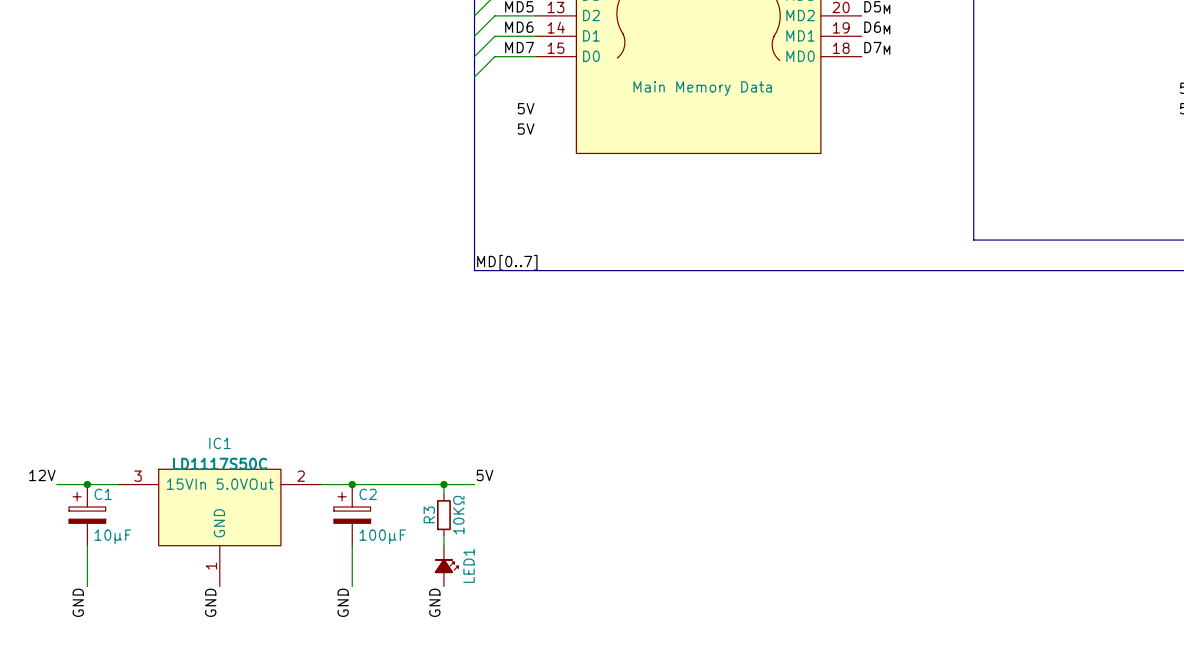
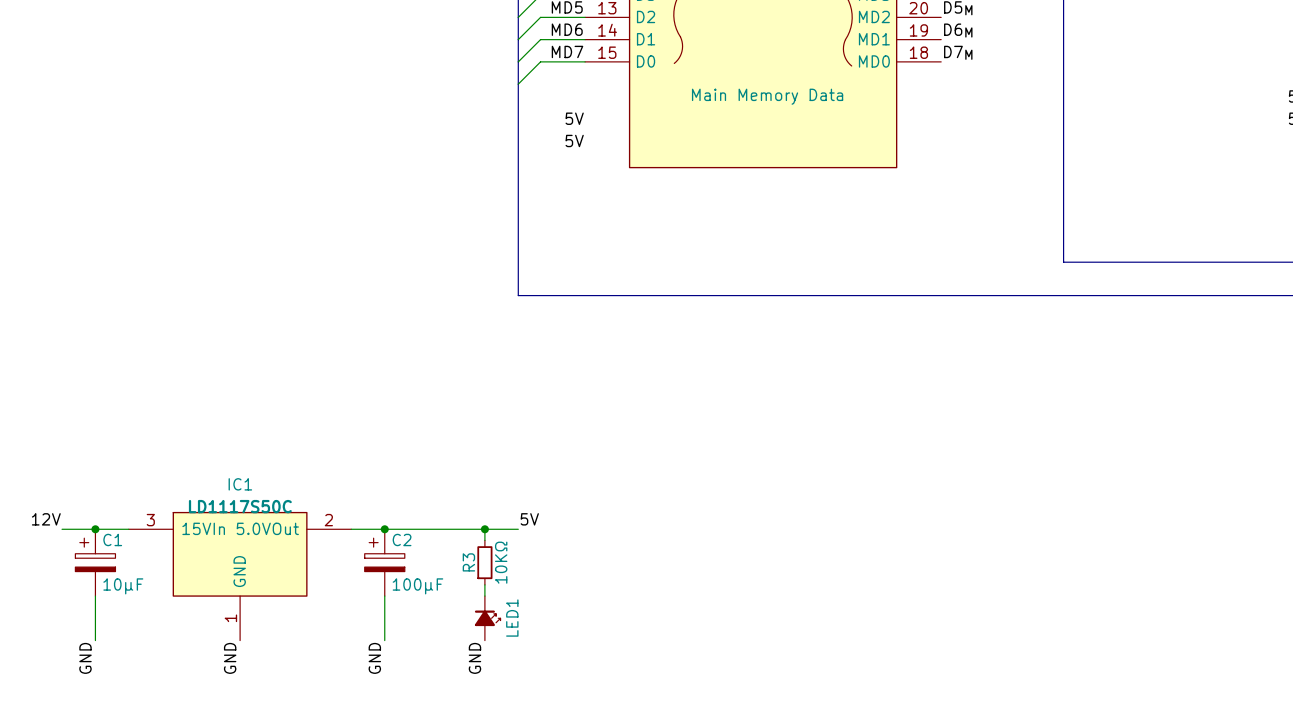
label: MD[0..7] (507, 262) -> none

